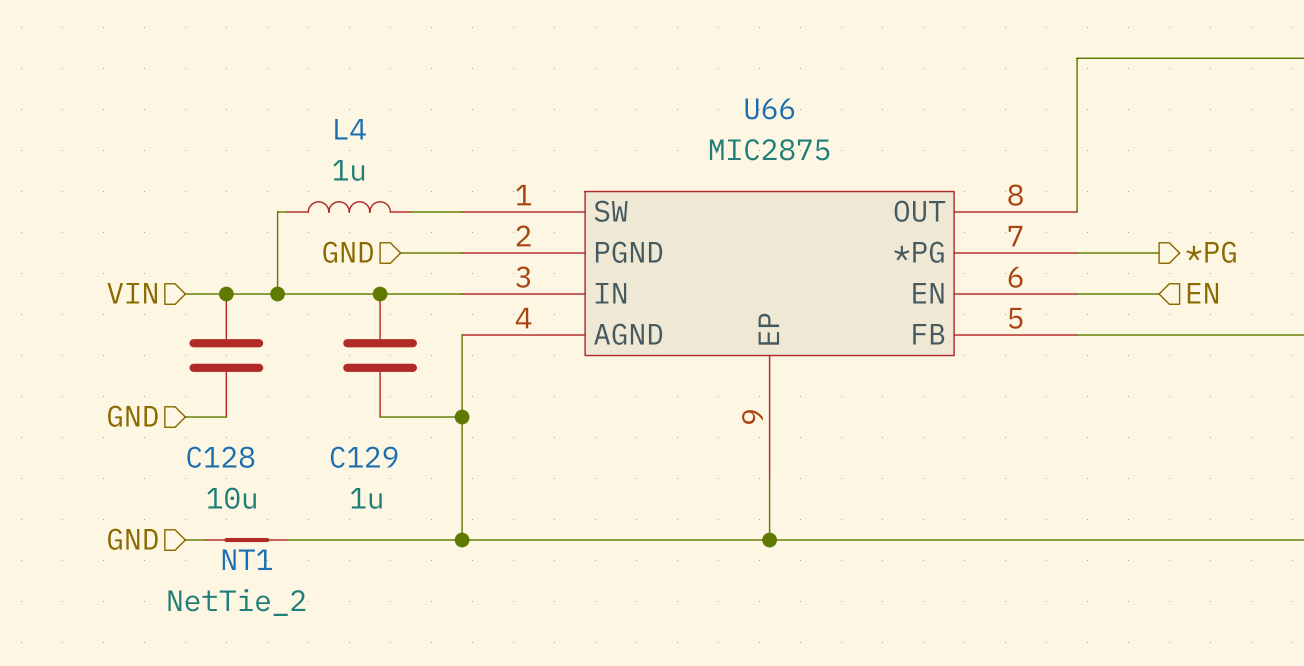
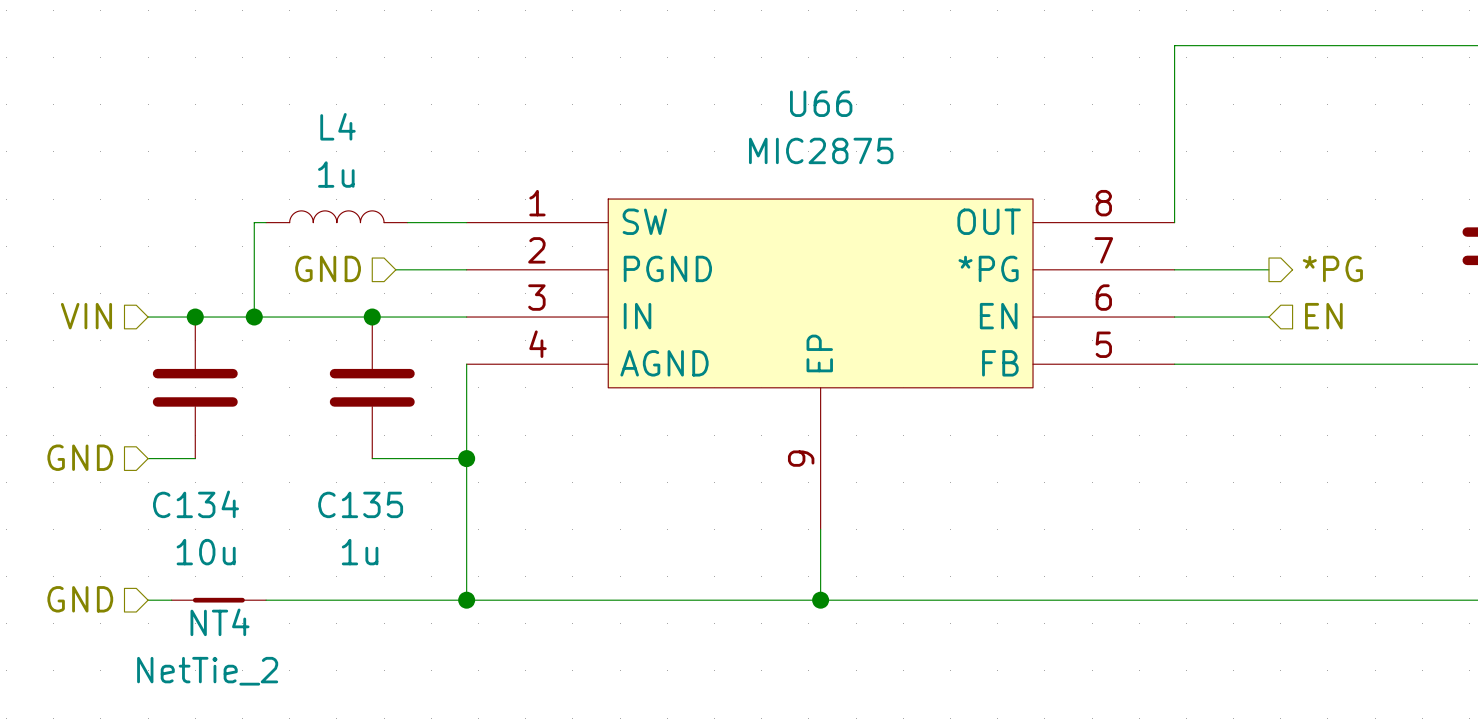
C128 name: C128 (220, 457) -> C134 (196, 504)
C129 name: C129 (364, 457) -> C135 (360, 504)
NT1 name: NT1 (247, 559) -> NT4 (220, 622)

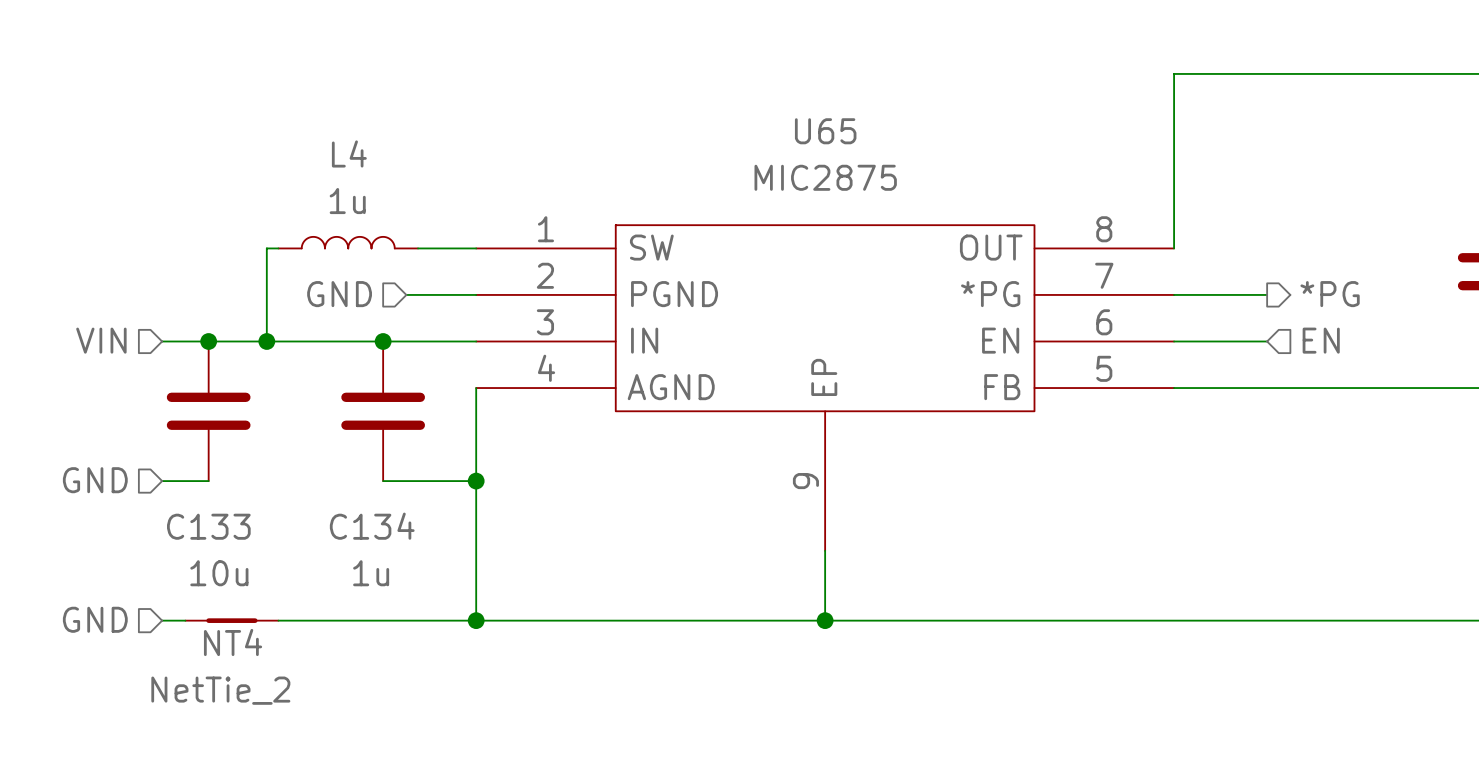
U66 name: U66 (821, 103) -> U65 (825, 131)
C134 name: C134 (196, 504) -> C133 (208, 526)
C135 name: C135 (360, 504) -> C134 (372, 526)

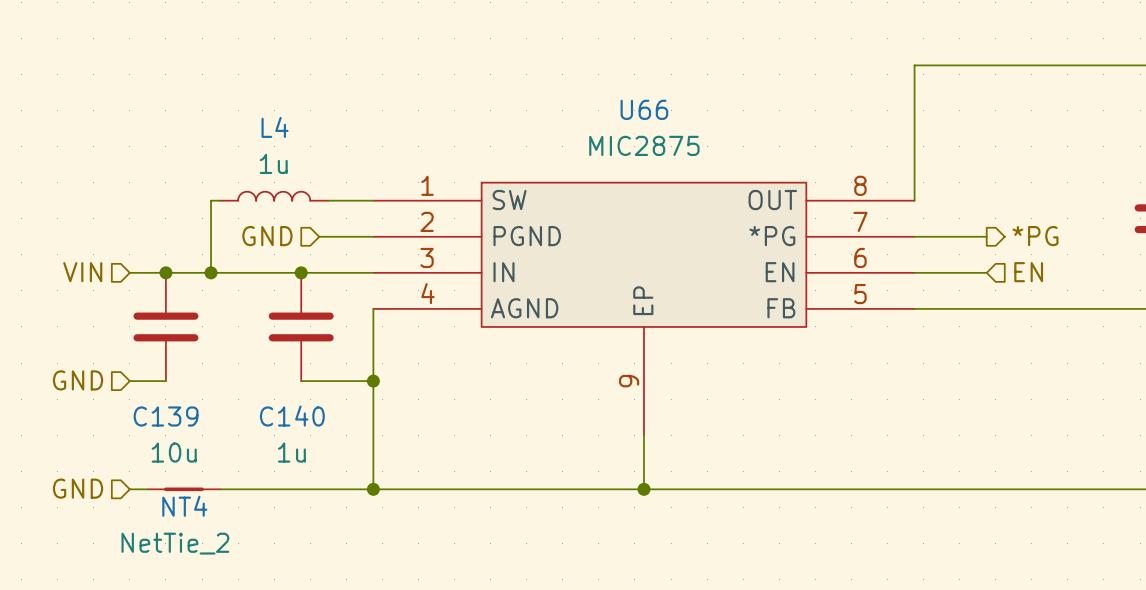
U65 name: U65 (825, 131) -> U66 (644, 109)
C133 name: C133 (208, 526) -> C139 (166, 416)
C134 name: C134 (372, 526) -> C140 (292, 416)

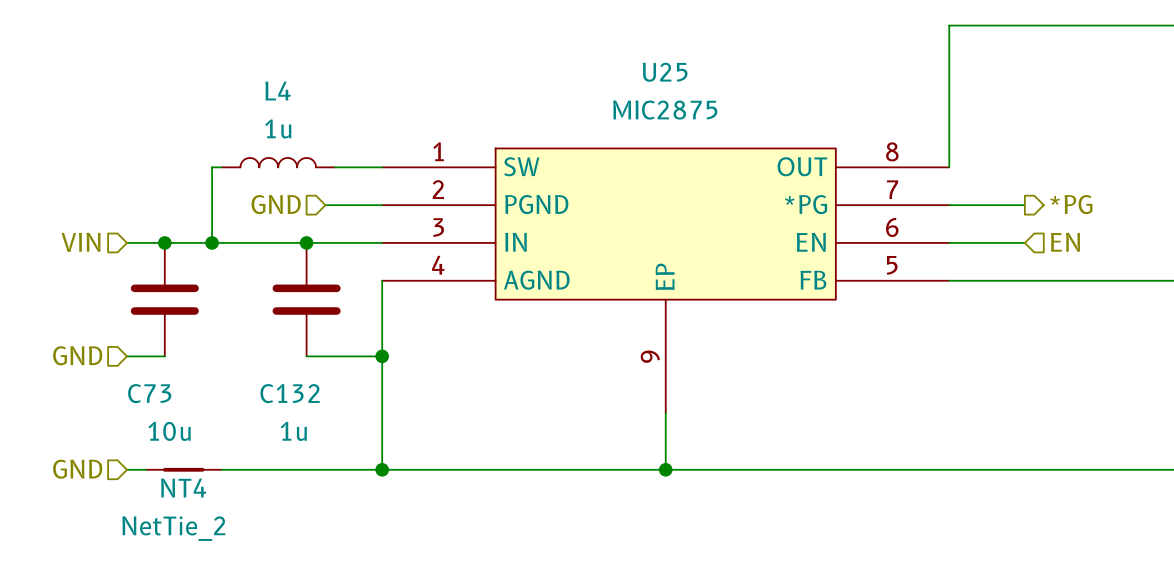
U66 name: U66 (644, 109) -> U25 (665, 72)
C139 name: C139 (166, 416) -> C73 (149, 393)
C140 name: C140 (292, 416) -> C132 (290, 393)

